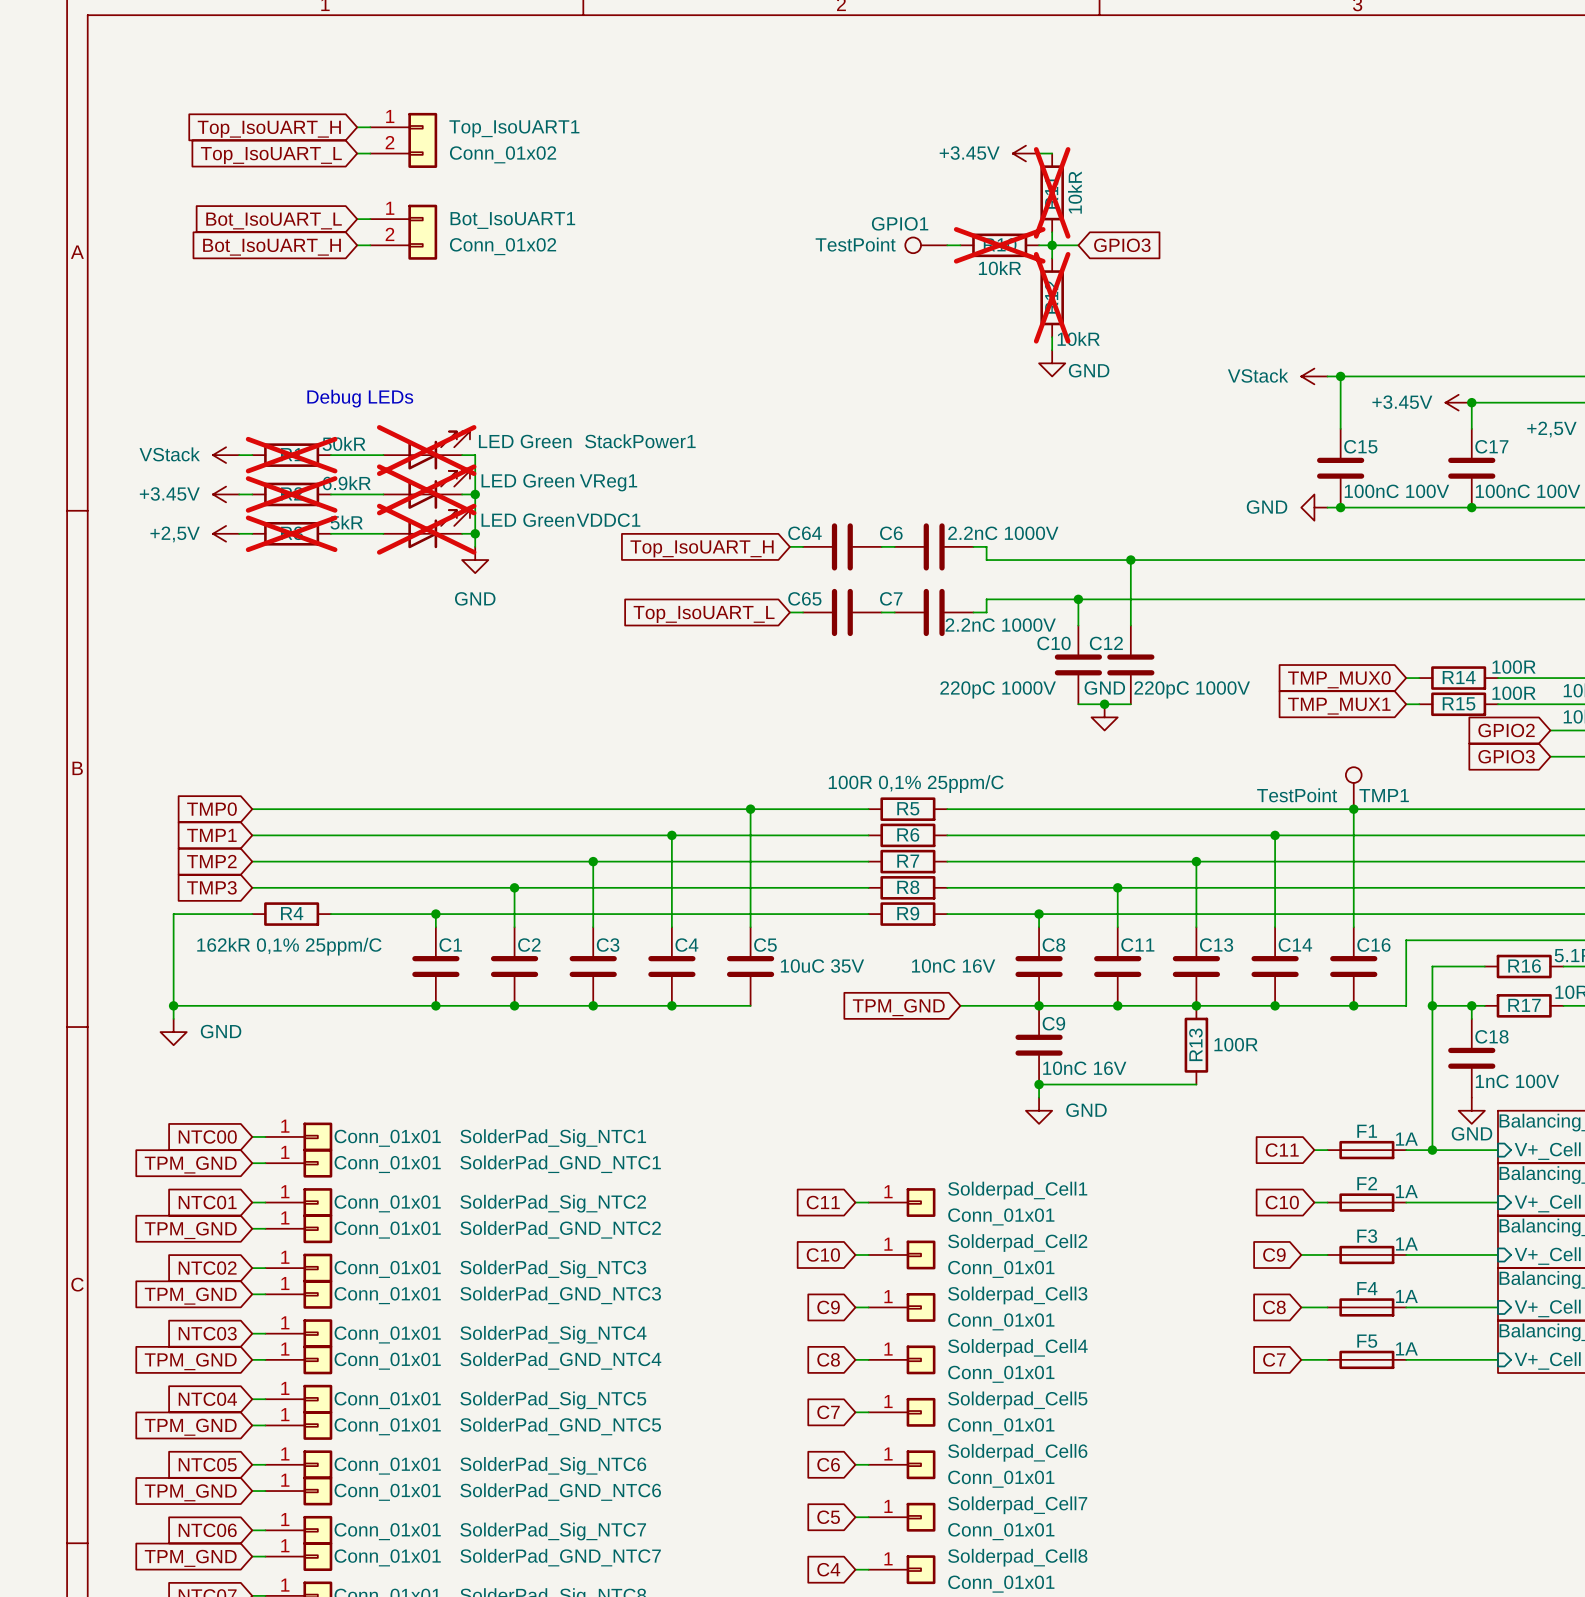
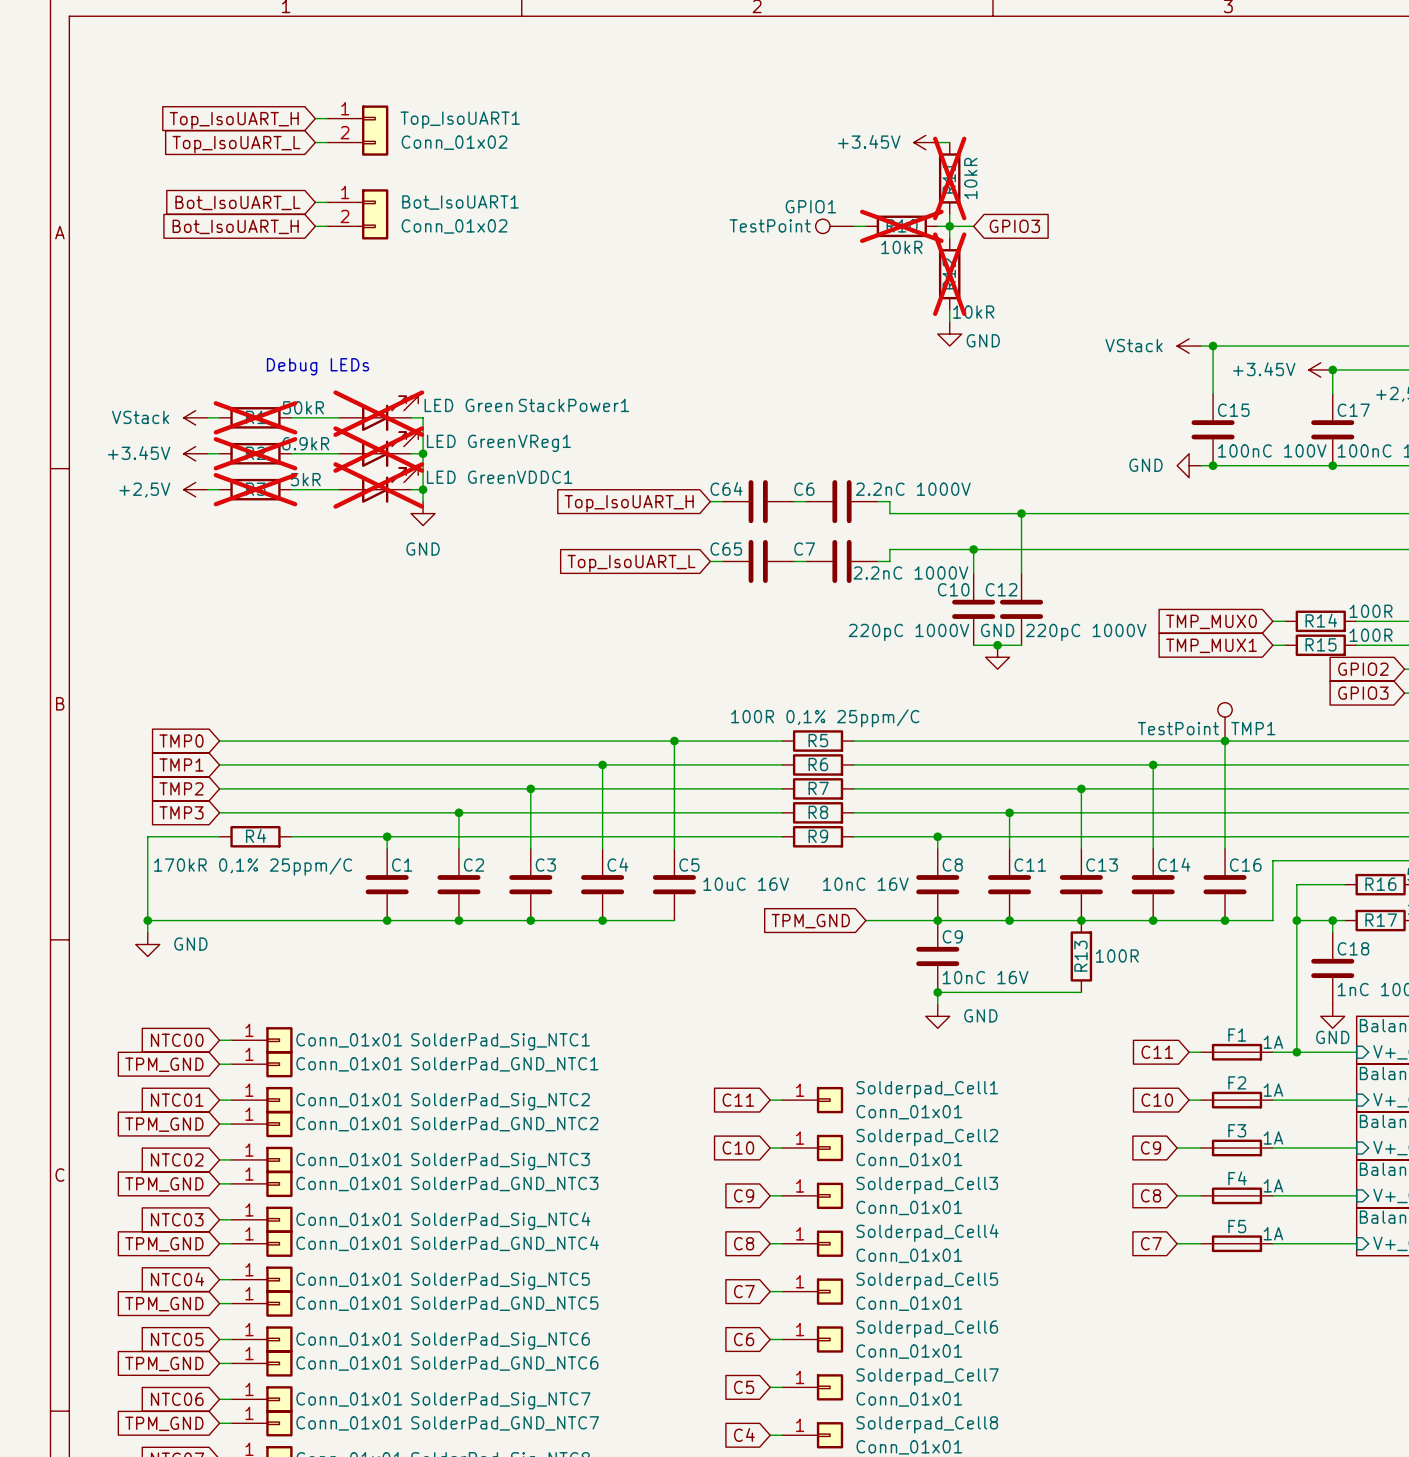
R4 value: 162kR 0,1% 25ppm/C (289, 946) -> 170kR 0,1% 25ppm/C (253, 866)
C5 value: 10uC 35V (822, 966) -> 10uC 16V (746, 884)

